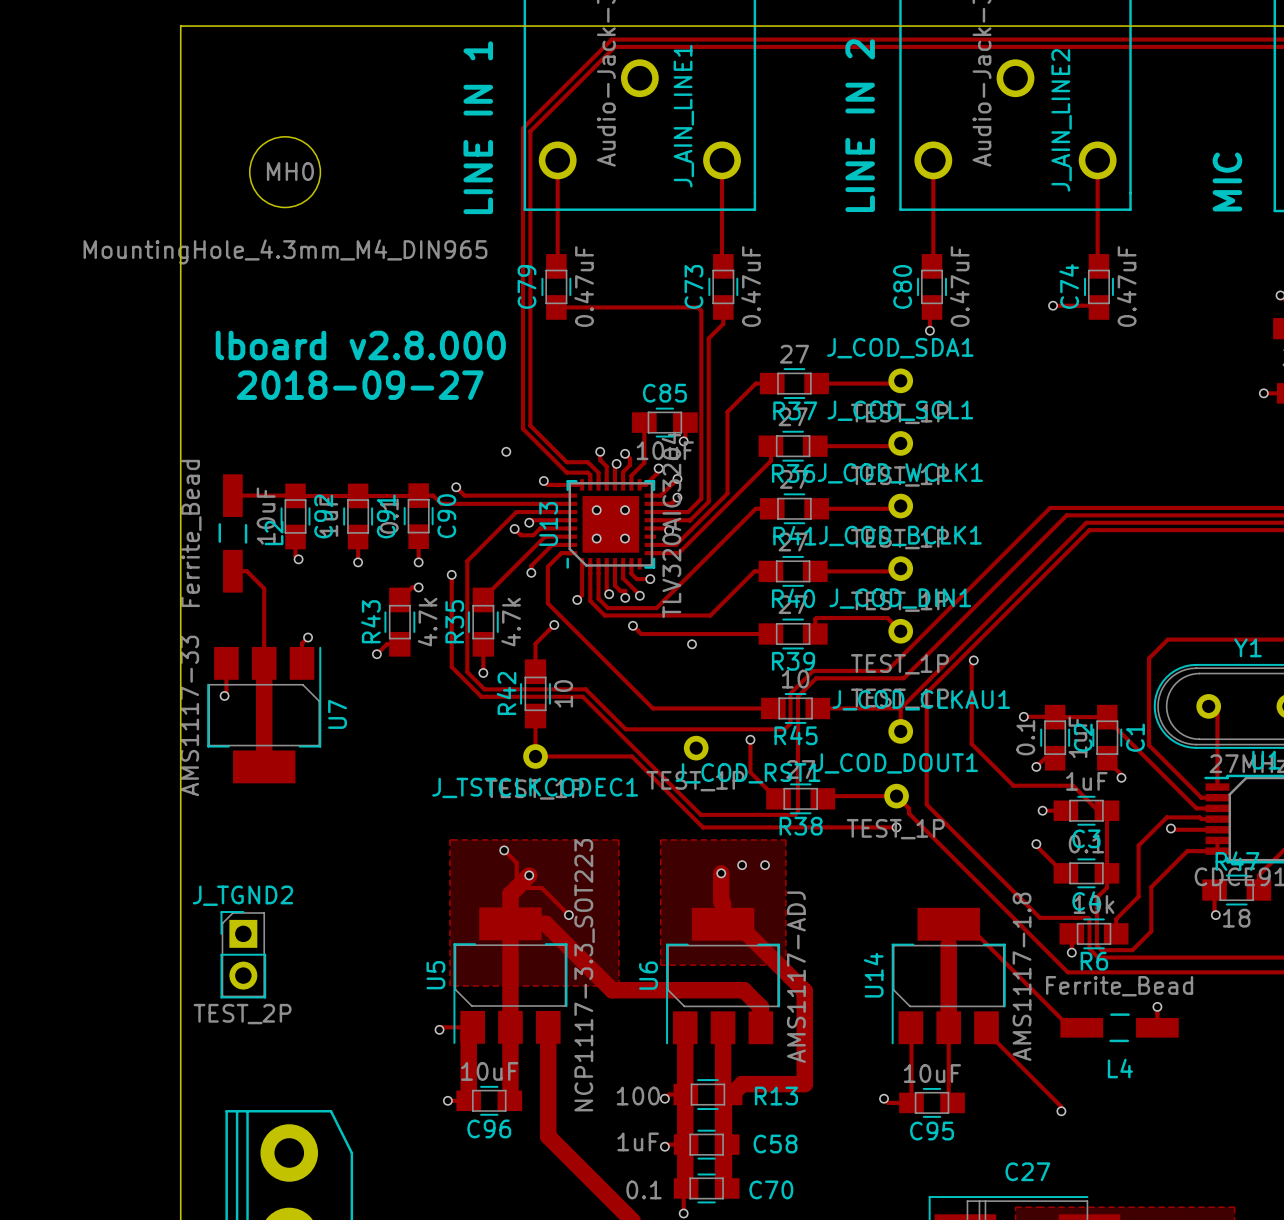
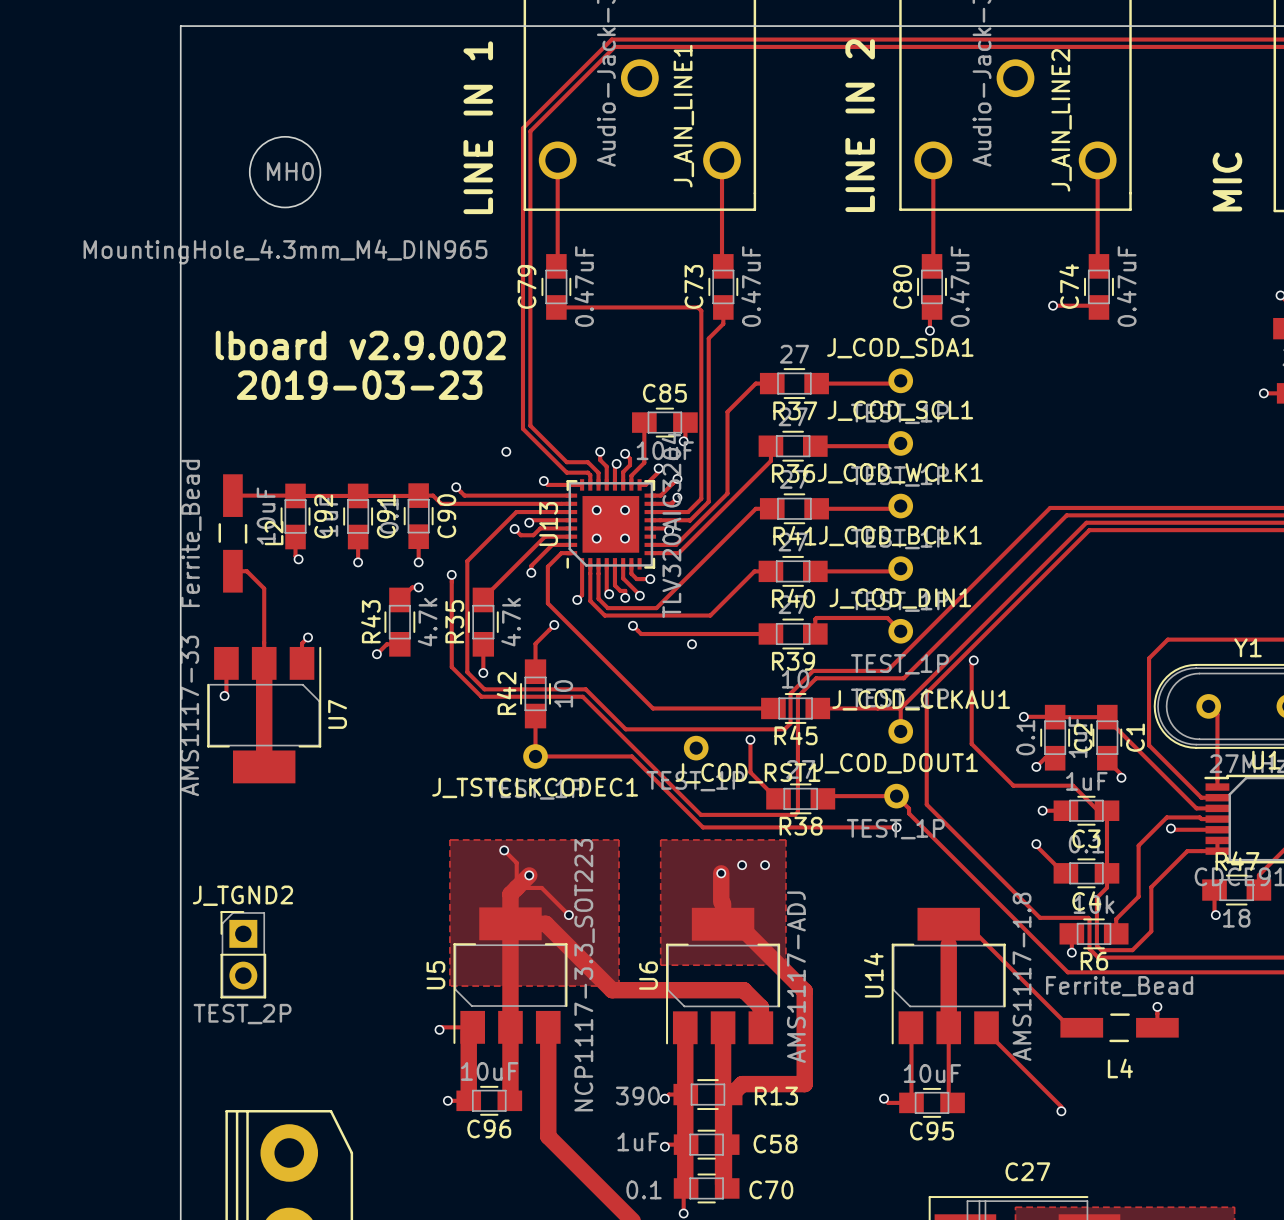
text: lboard v2.8.000 (360, 345) -> lboard v2.9.002 (360, 345)
text: 2018-09-27 (360, 385) -> 2019-03-23 (359, 385)
R13 value: 100 (638, 1096) -> 390 (637, 1096)

